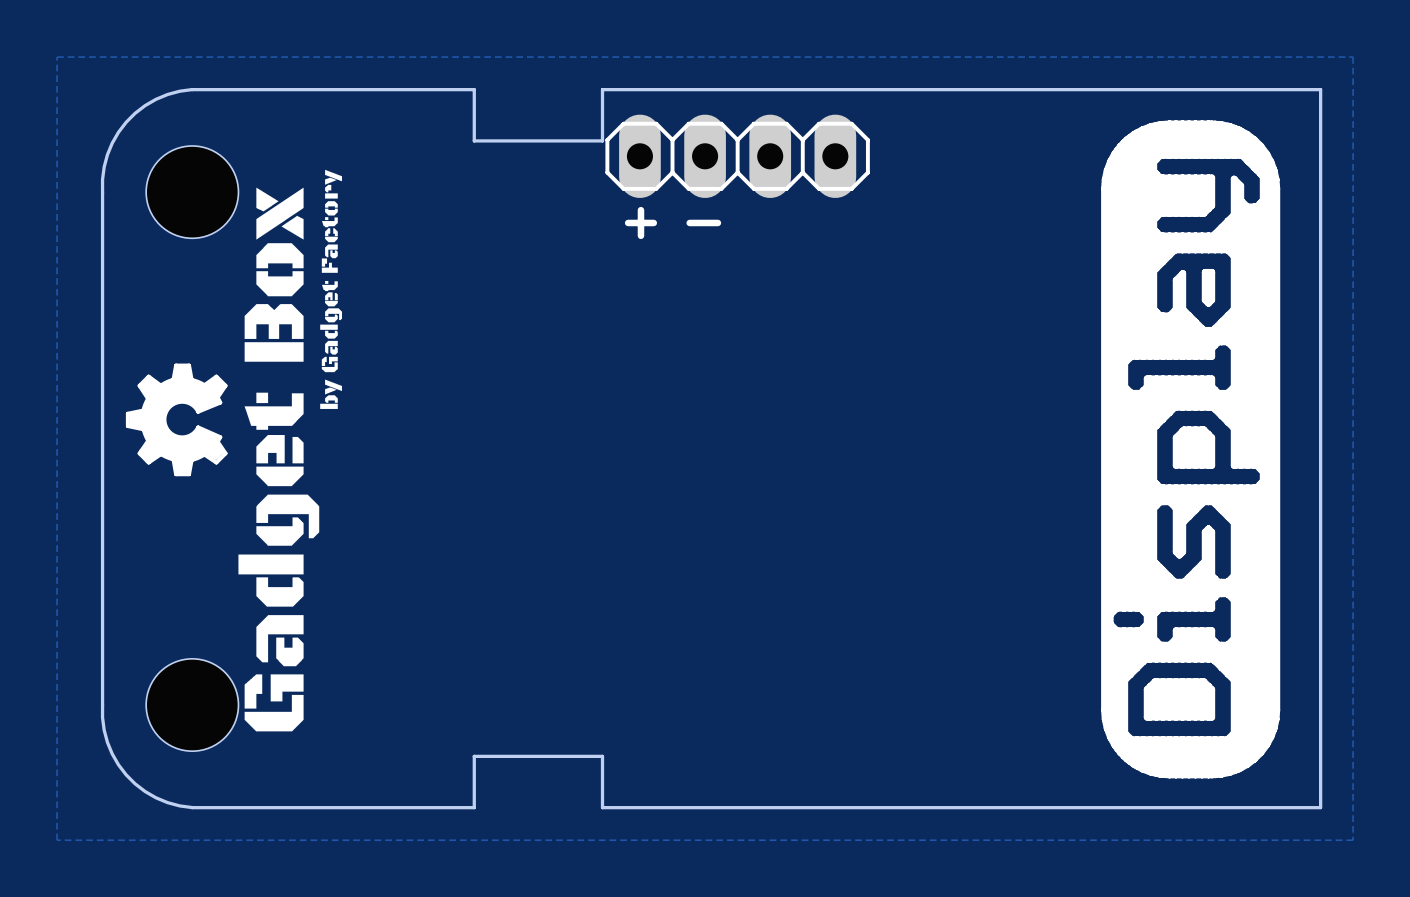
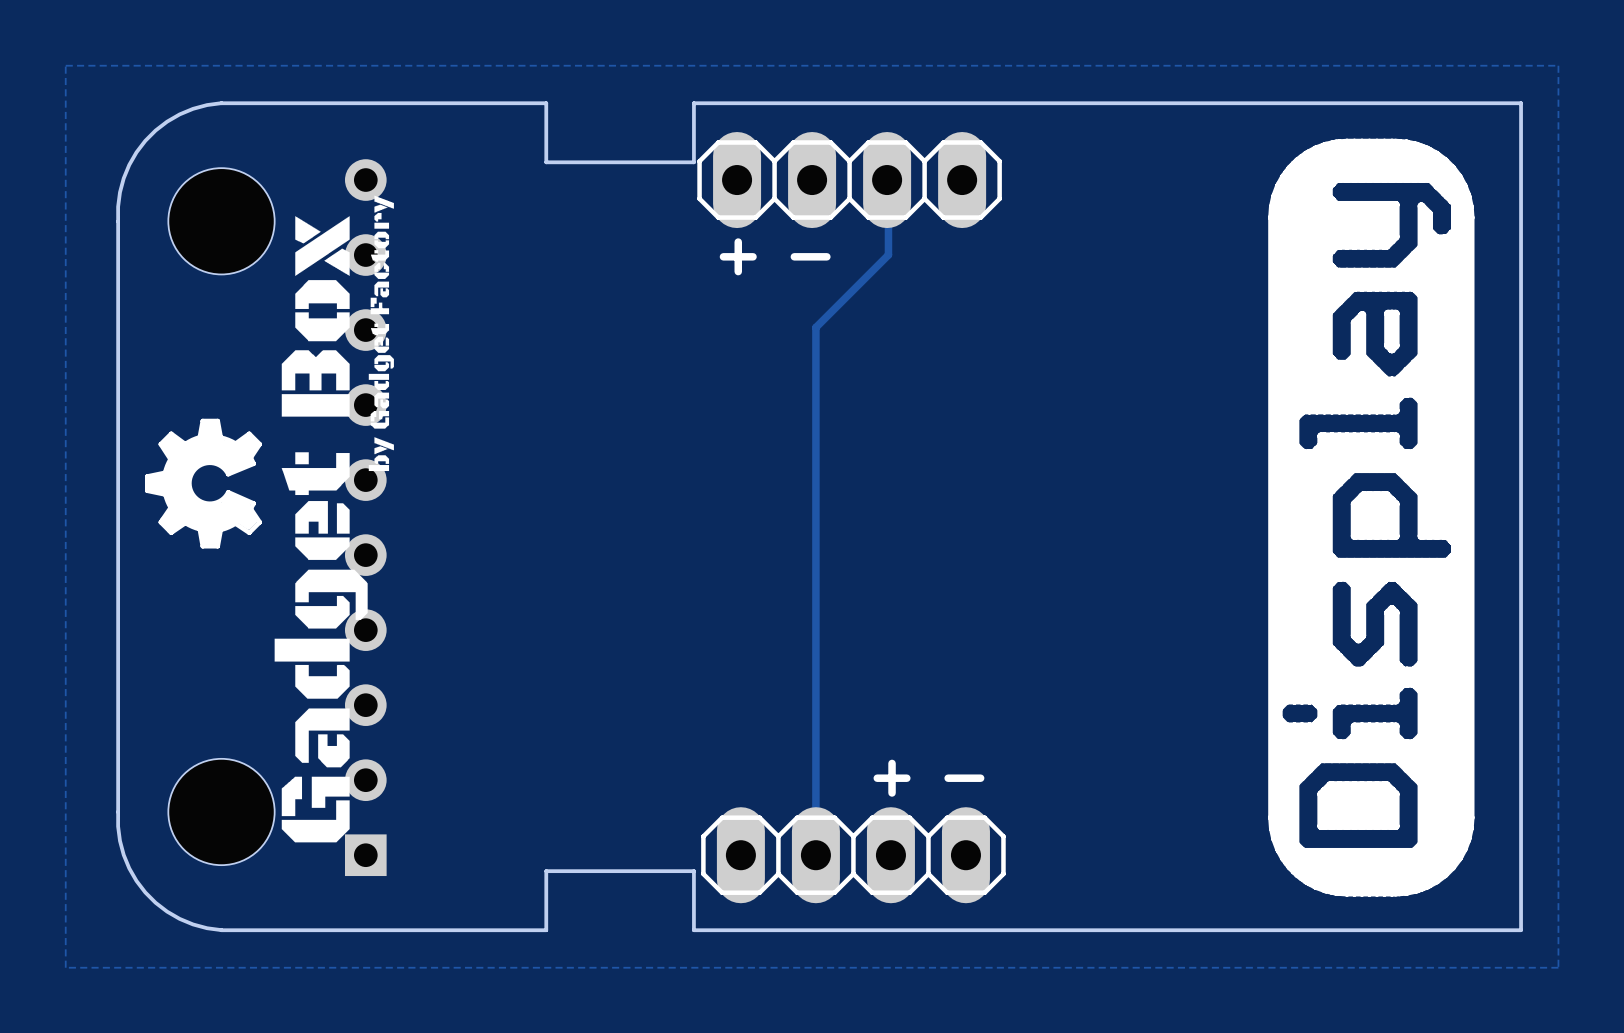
part footprint: [100, 87, 1323, 810] -> [116, 101, 1523, 933]
track: none -> (890, 180) (888, 182) (888, 254) (815, 327) (815, 855)
line: none -> (892, 763) (892, 792)
line: none -> (877, 778) (906, 778)
line: none -> (948, 778) (980, 778)
part: none -> (853, 855)

